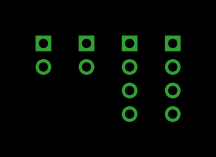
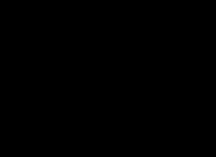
part: (43, 55) -> none
part: (86, 55) -> none
part: (129, 78) -> none
part: (172, 78) -> none

